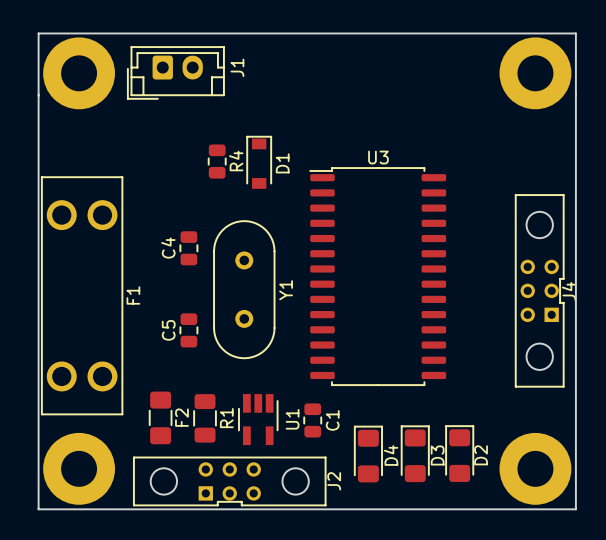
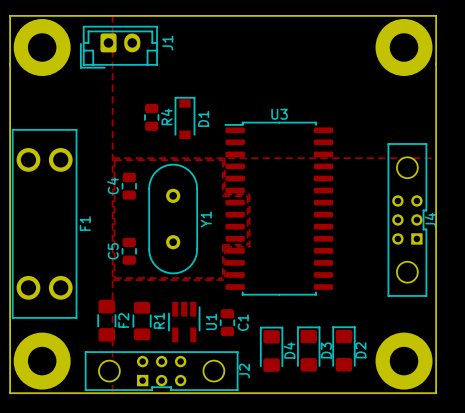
zone outline: none -> (112, 15) (112, 393)
zone outline: none -> (112, 158) (436, 158)
zone outline: none -> (224, 158) (224, 194) (249, 194) (249, 246) (224, 246) (224, 280) (112, 280)
zone outline: none -> (114, 160) (114, 278) (222, 278) (222, 244) (247, 244) (247, 196) (222, 196) (222, 160) (114, 160)

